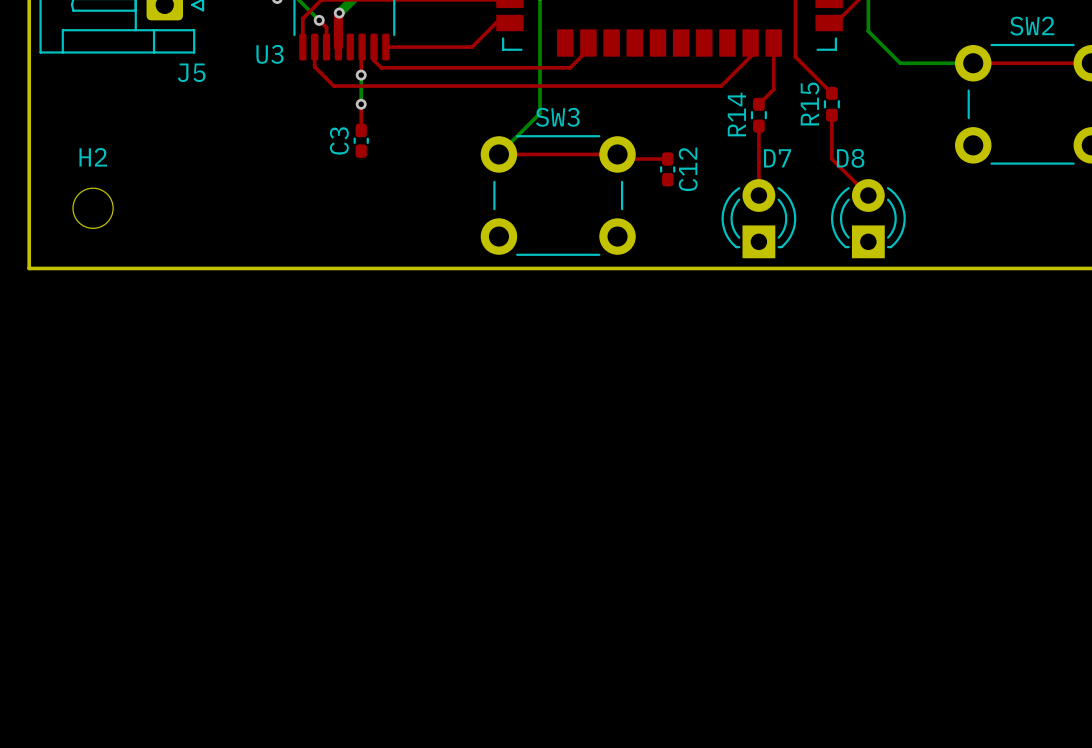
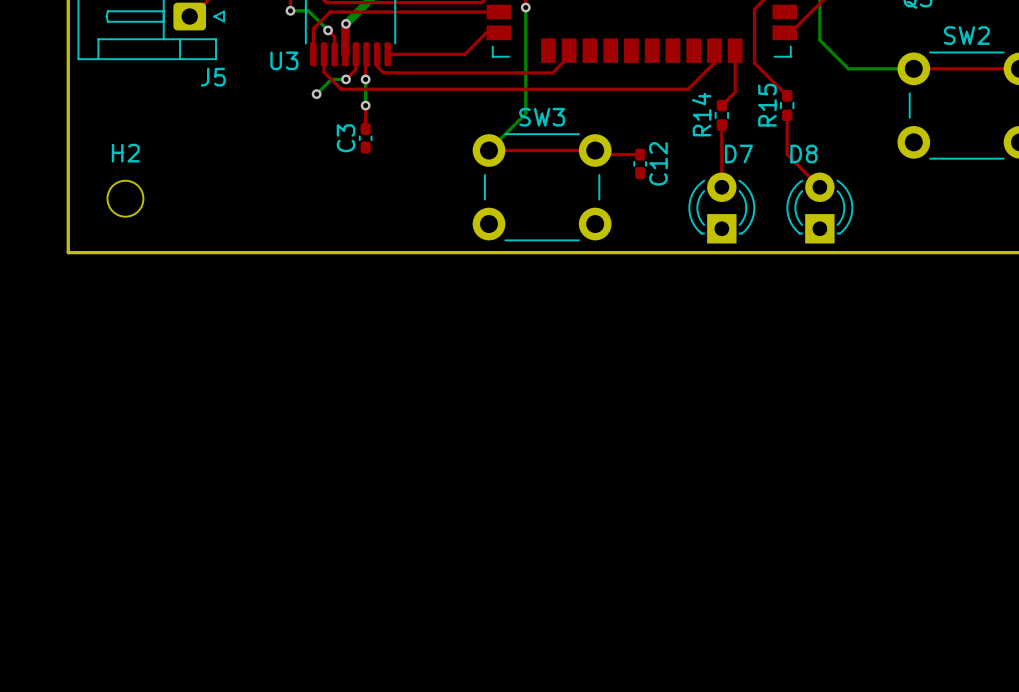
top track: none -> (355, 54) (355, 69) (346, 79)
bottom track: none -> (346, 79) (331, 79) (316, 94)
via: none -> (346, 79)
via: none -> (316, 94)

